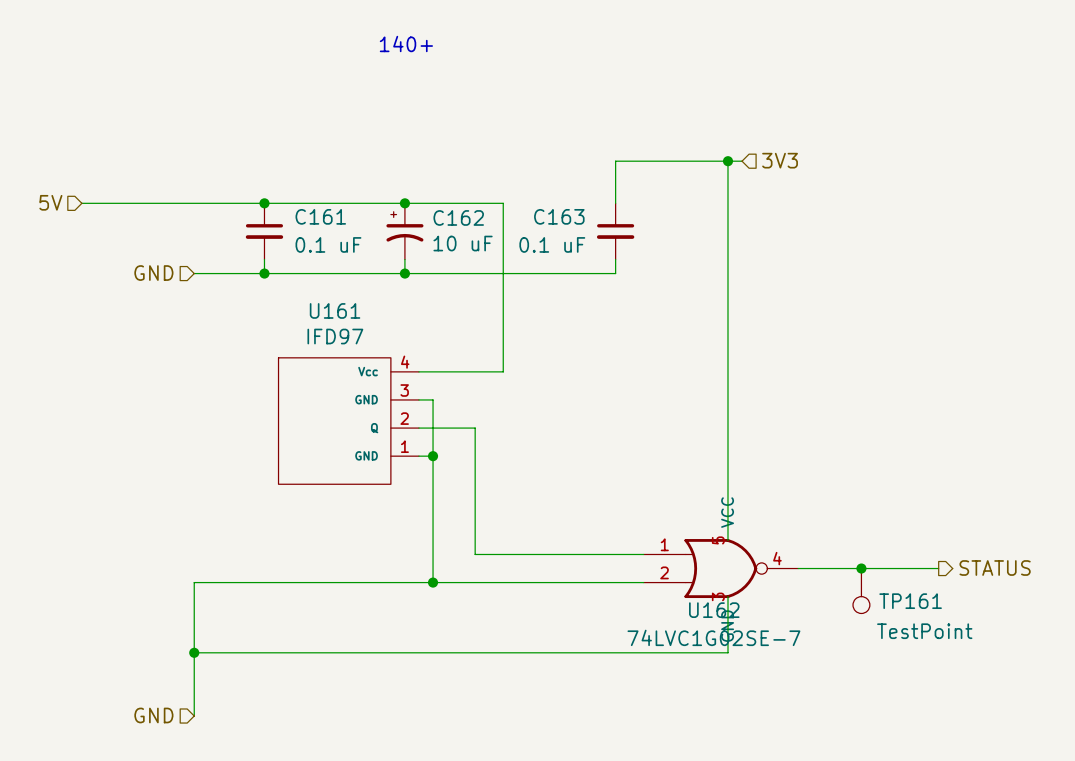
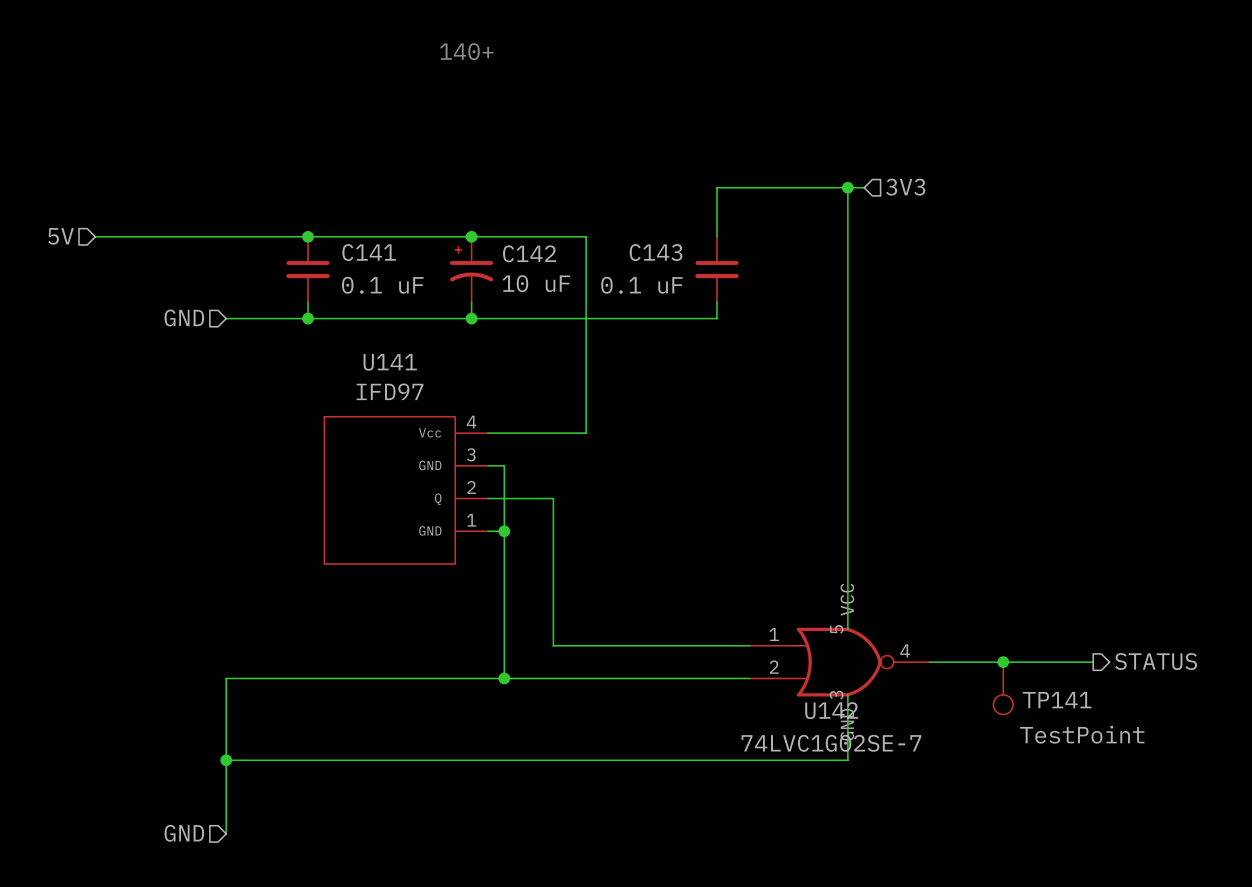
C161 name: C161 (320, 216) -> C141 (369, 252)
C163 name: C163 (559, 216) -> C143 (656, 252)
C162 name: C162 (458, 217) -> C142 (529, 253)
U161 name: U161 (335, 310) -> U141 (390, 362)
TP161 name: TP161 (910, 601) -> TP141 (1057, 700)
U162 name: U162 (714, 610) -> U142 (831, 710)

